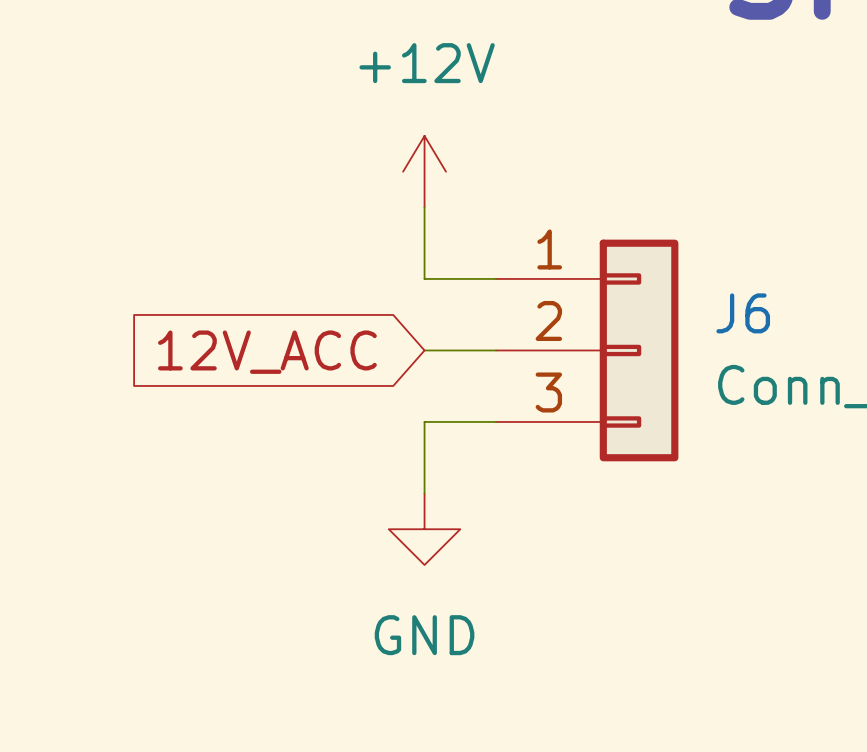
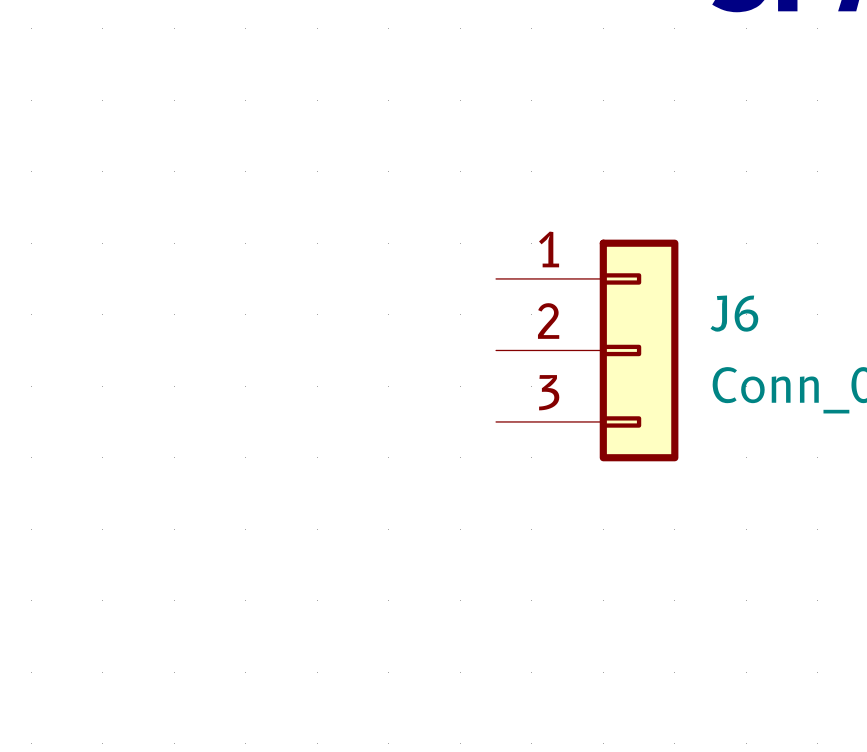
power symbol: +12V (424, 171) -> none
wire: (424, 207) (424, 278) (496, 278) -> none
wire: (424, 350) (496, 350) -> none
global label: 12V_ACC (267, 352) -> none
wire: (496, 421) (424, 421) (424, 493) -> none
power symbol: GND (424, 529) -> none

